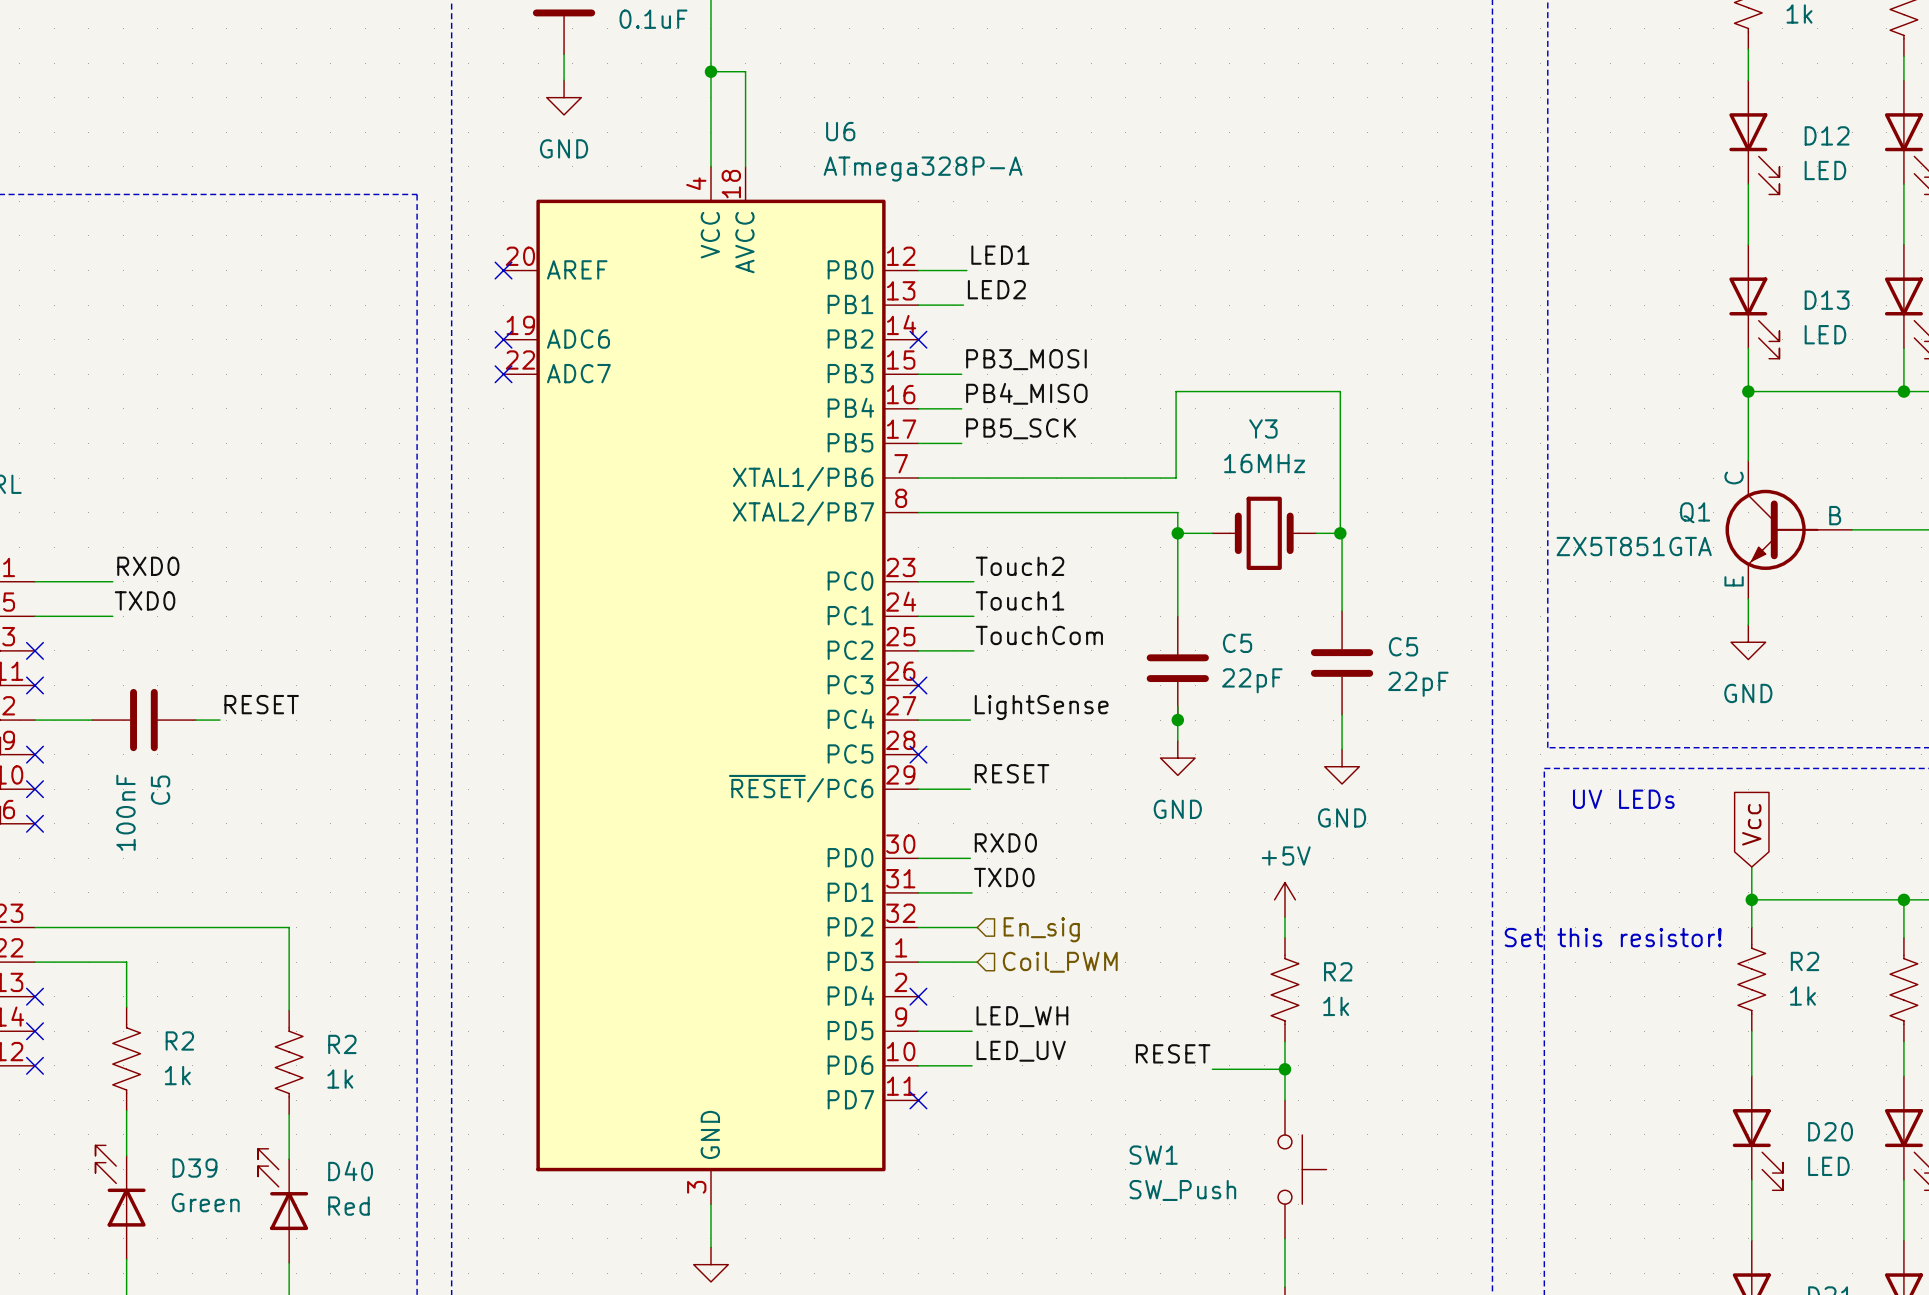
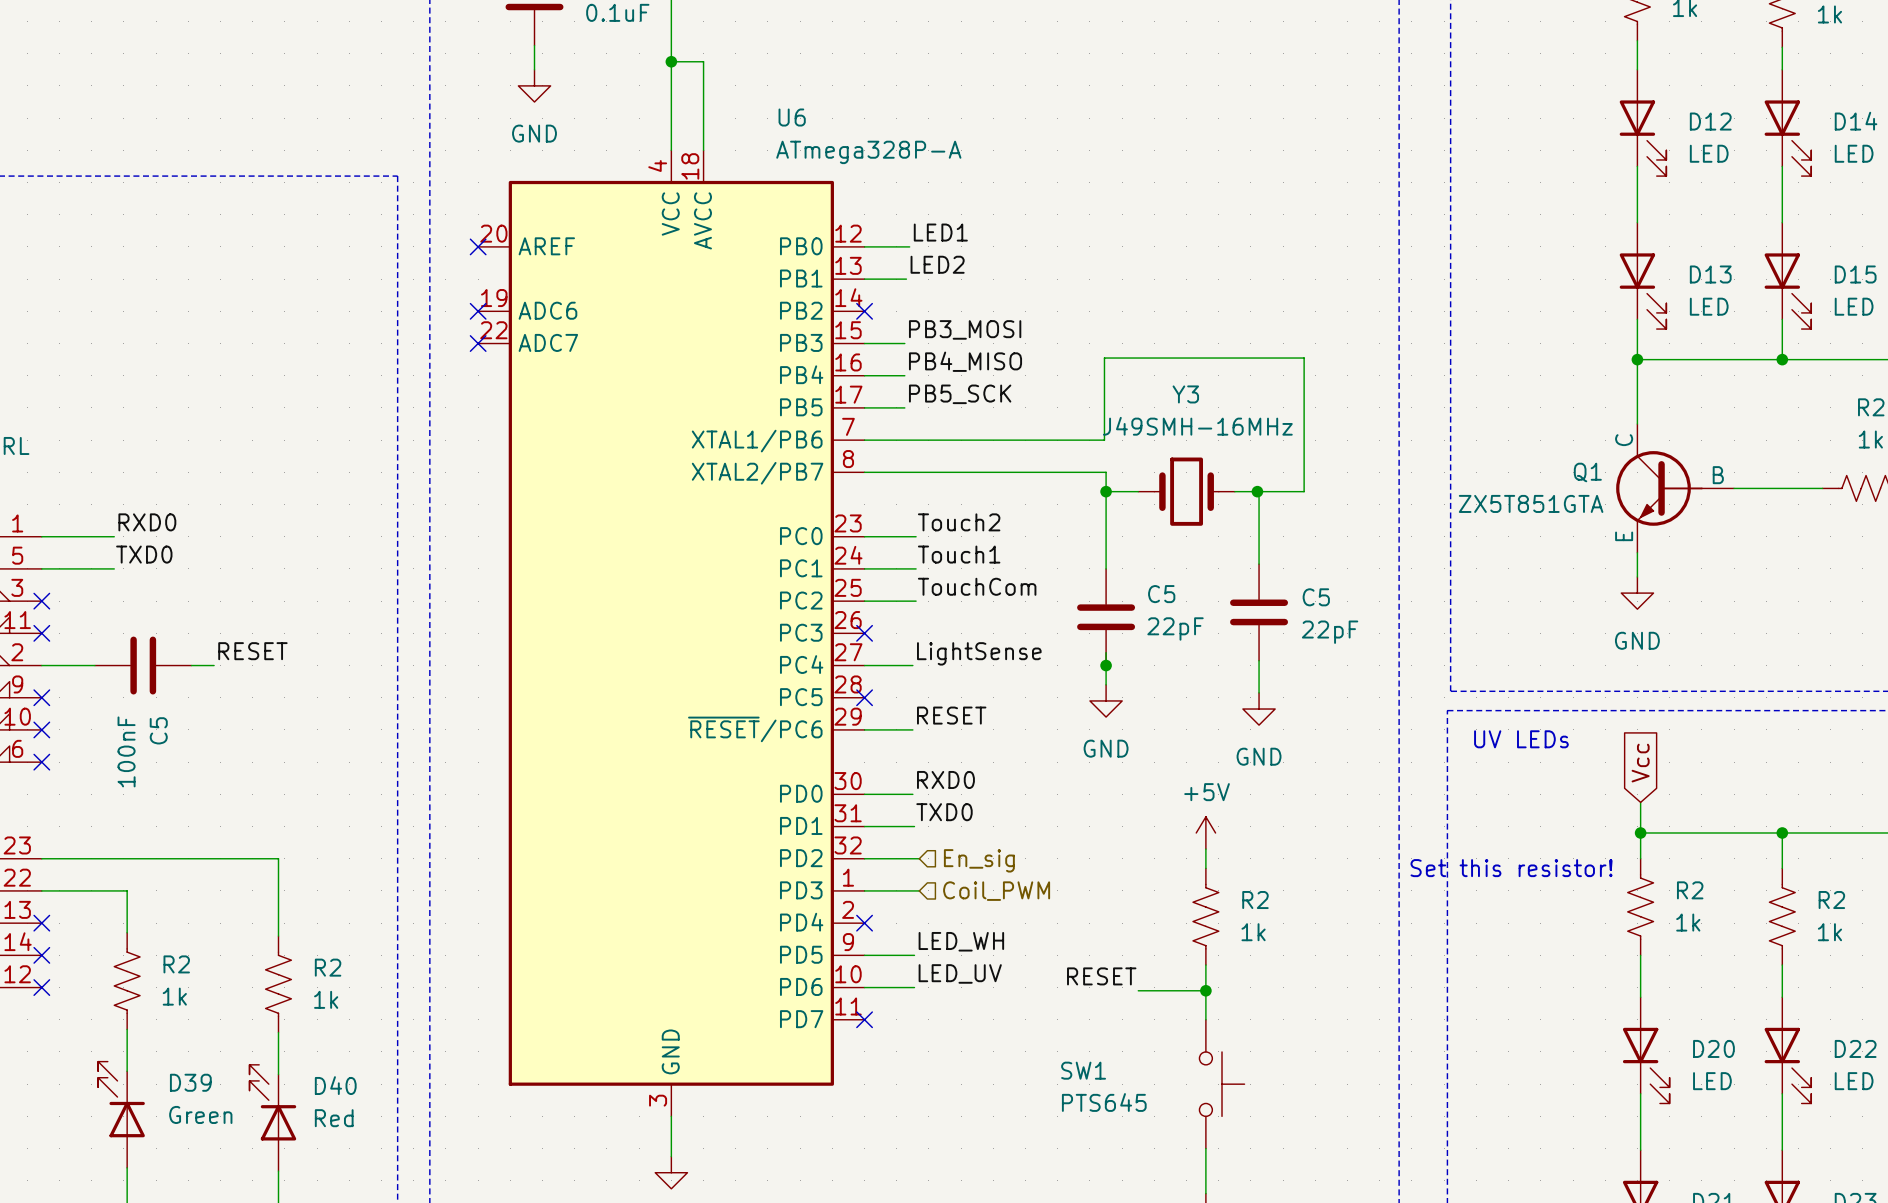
wire: (1176, 391) (1340, 391) (1340, 533) -> (1104, 359) (1104, 358) (1304, 358) (1304, 491) (1259, 491)
Y3 value: 16MHz (1264, 463) -> J49SMH-16MHz (1197, 426)
SW1 value: SW_Push (1182, 1190) -> PTS645 (1104, 1102)

